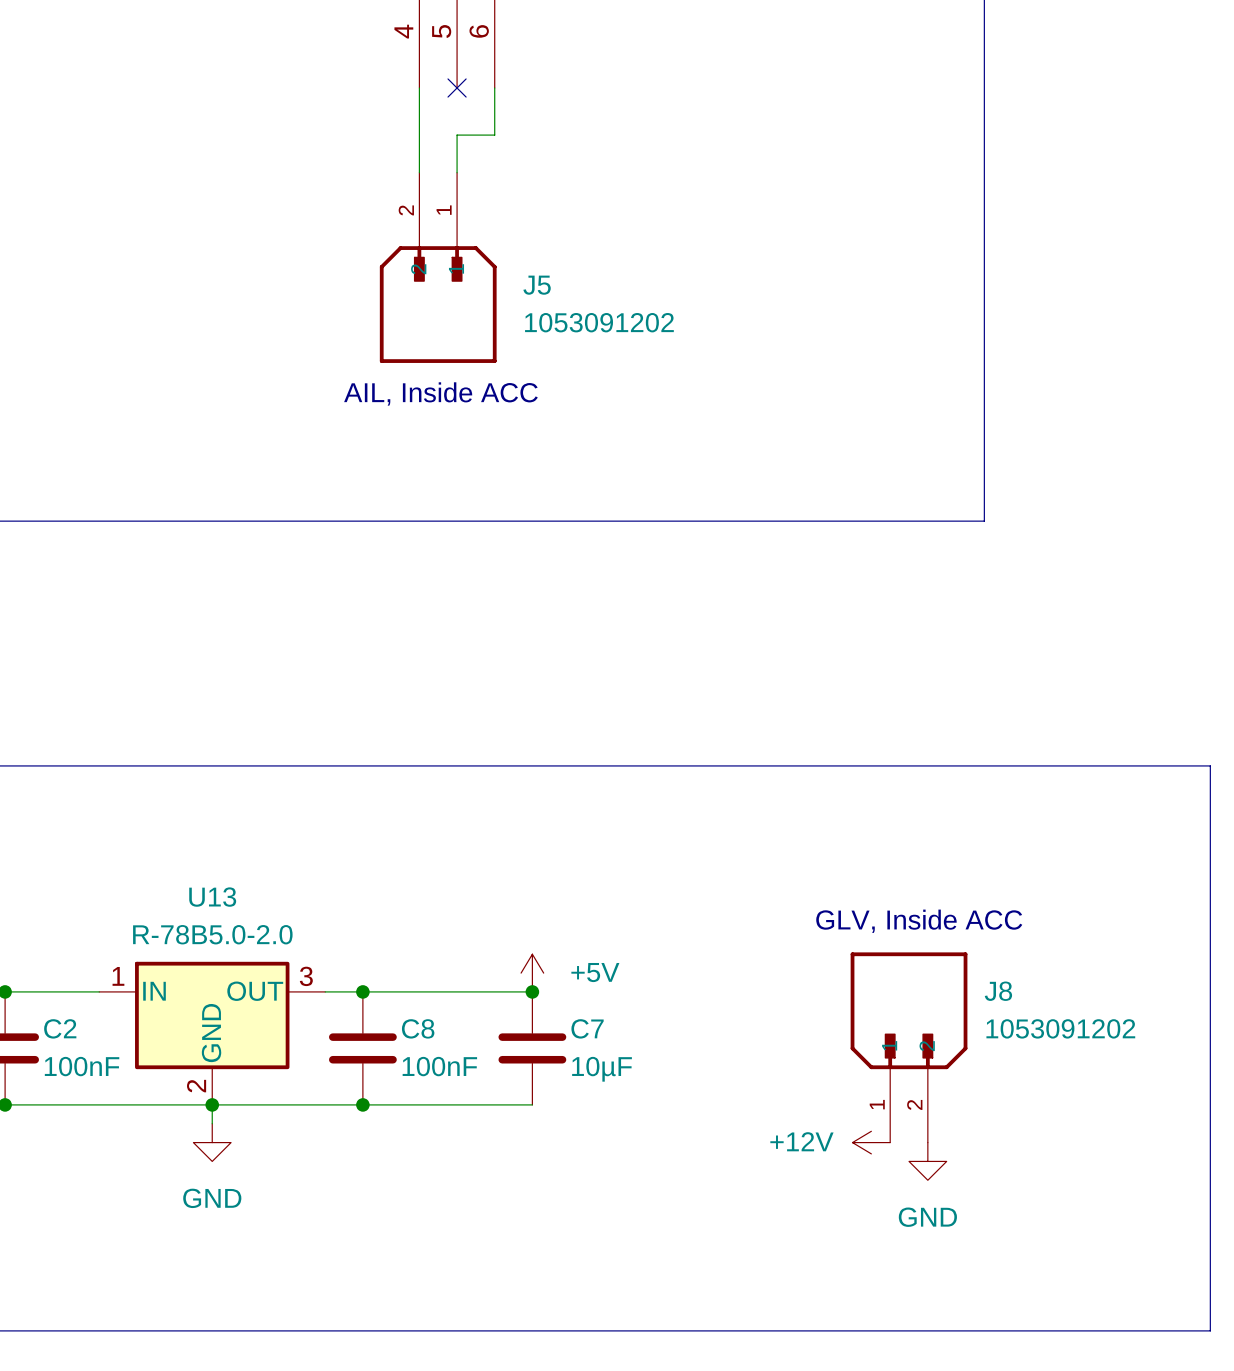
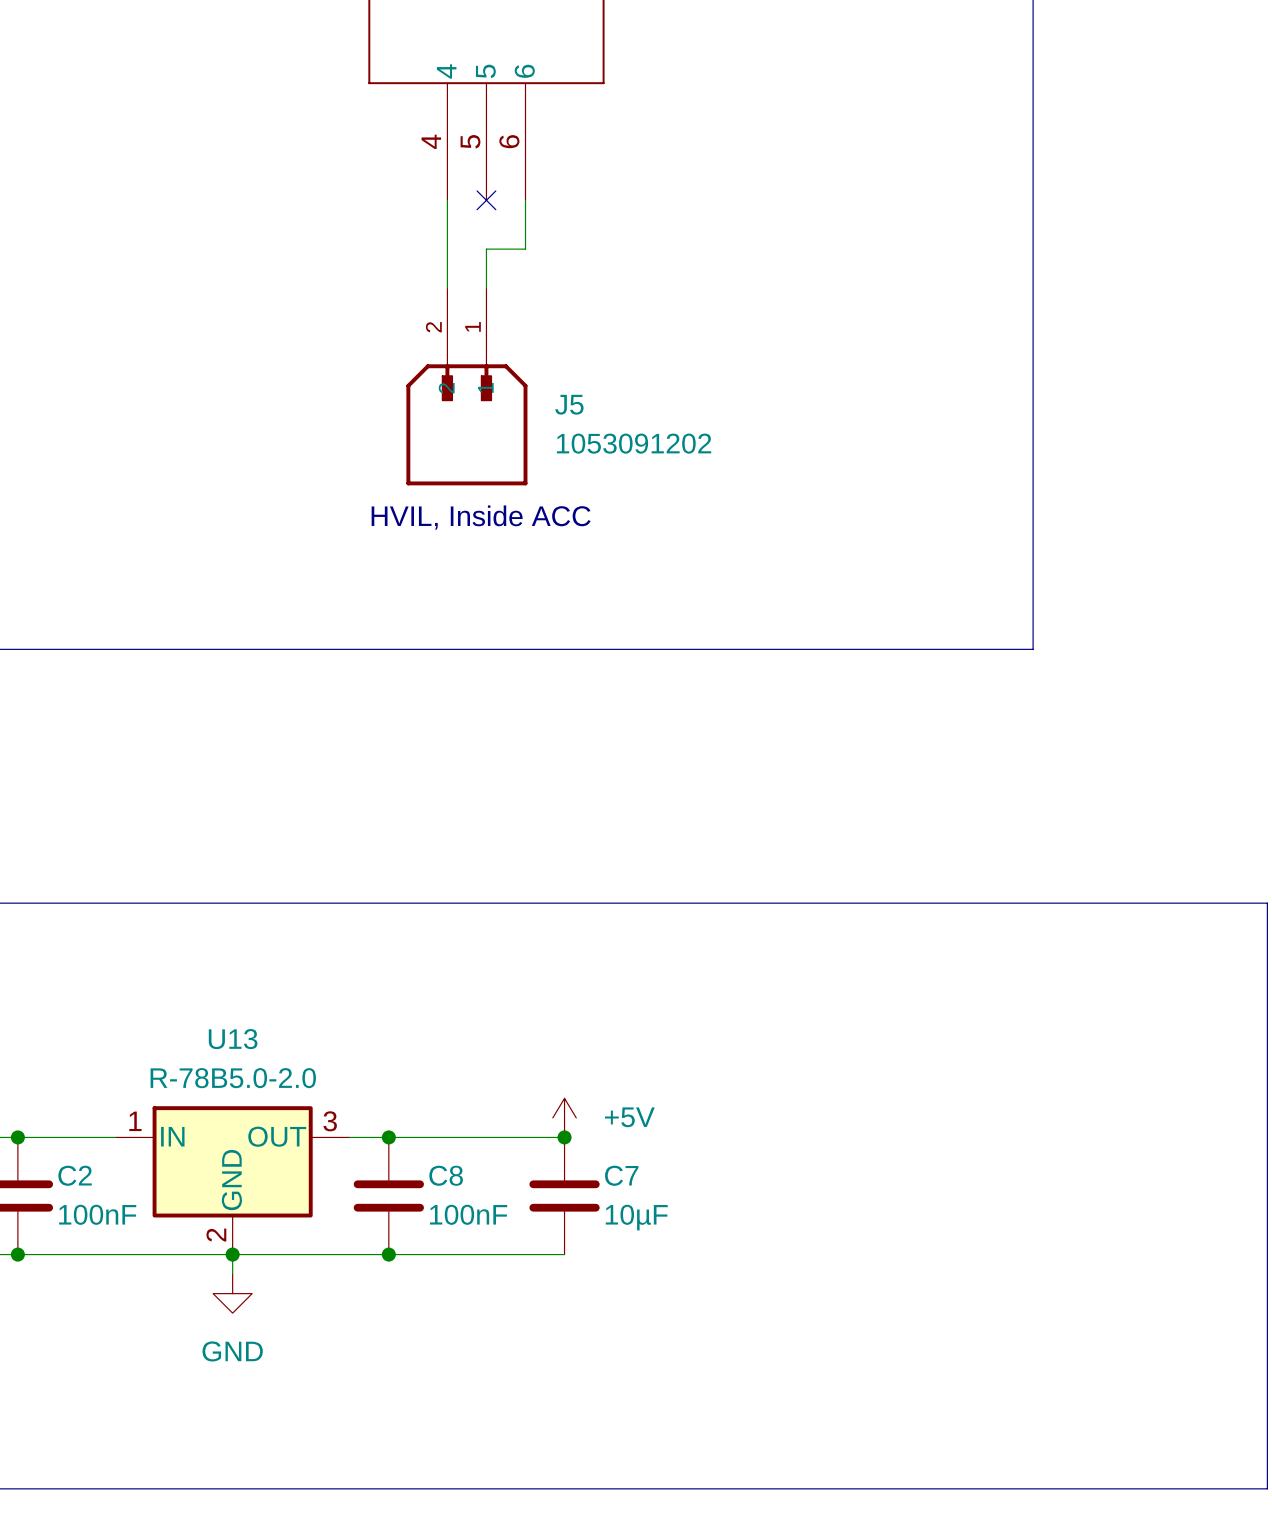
text: AIL, Inside ACC (440, 393) -> HVIL, Inside ACC (481, 517)
text: GLV, Inside ACC (919, 921) -> none
J8: 1053091202 (909, 1047) -> none
power symbol: +12V (871, 1142) -> none
power symbol: GND (927, 1161) -> none

